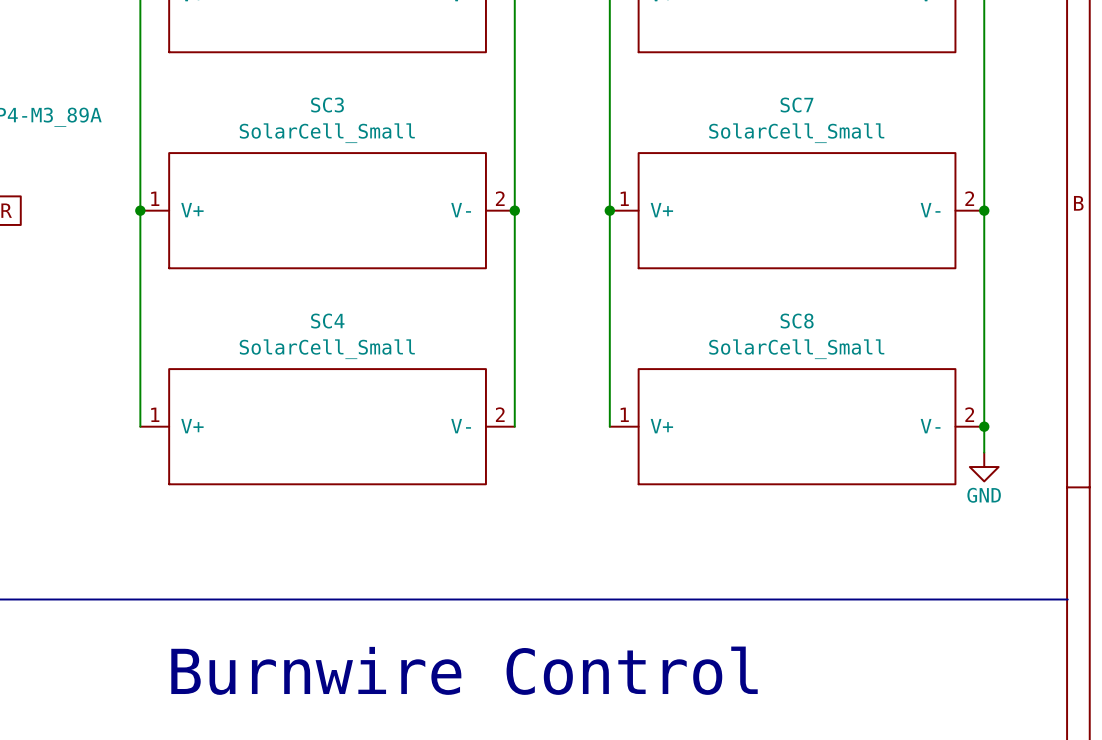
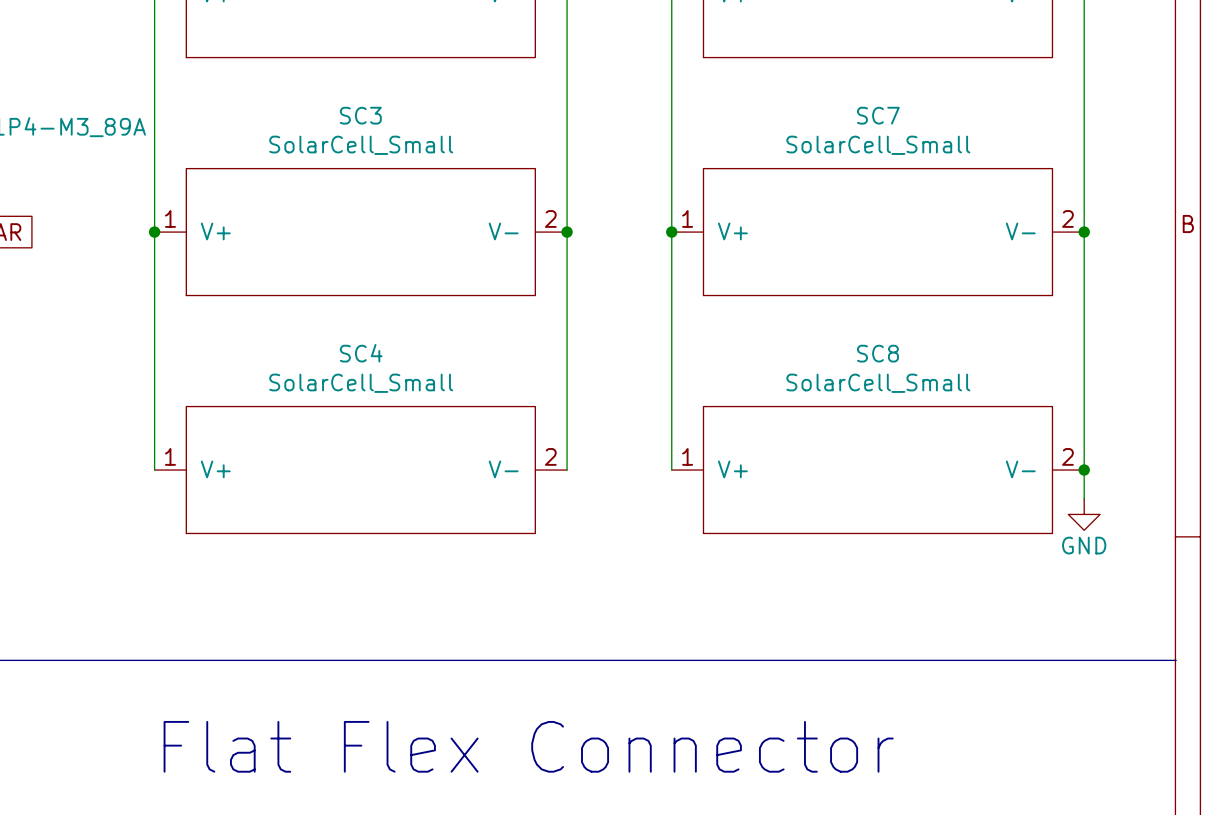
text: Burnwire Control (464, 670) -> none
text: none -> Flat Flex Connector (528, 746)

